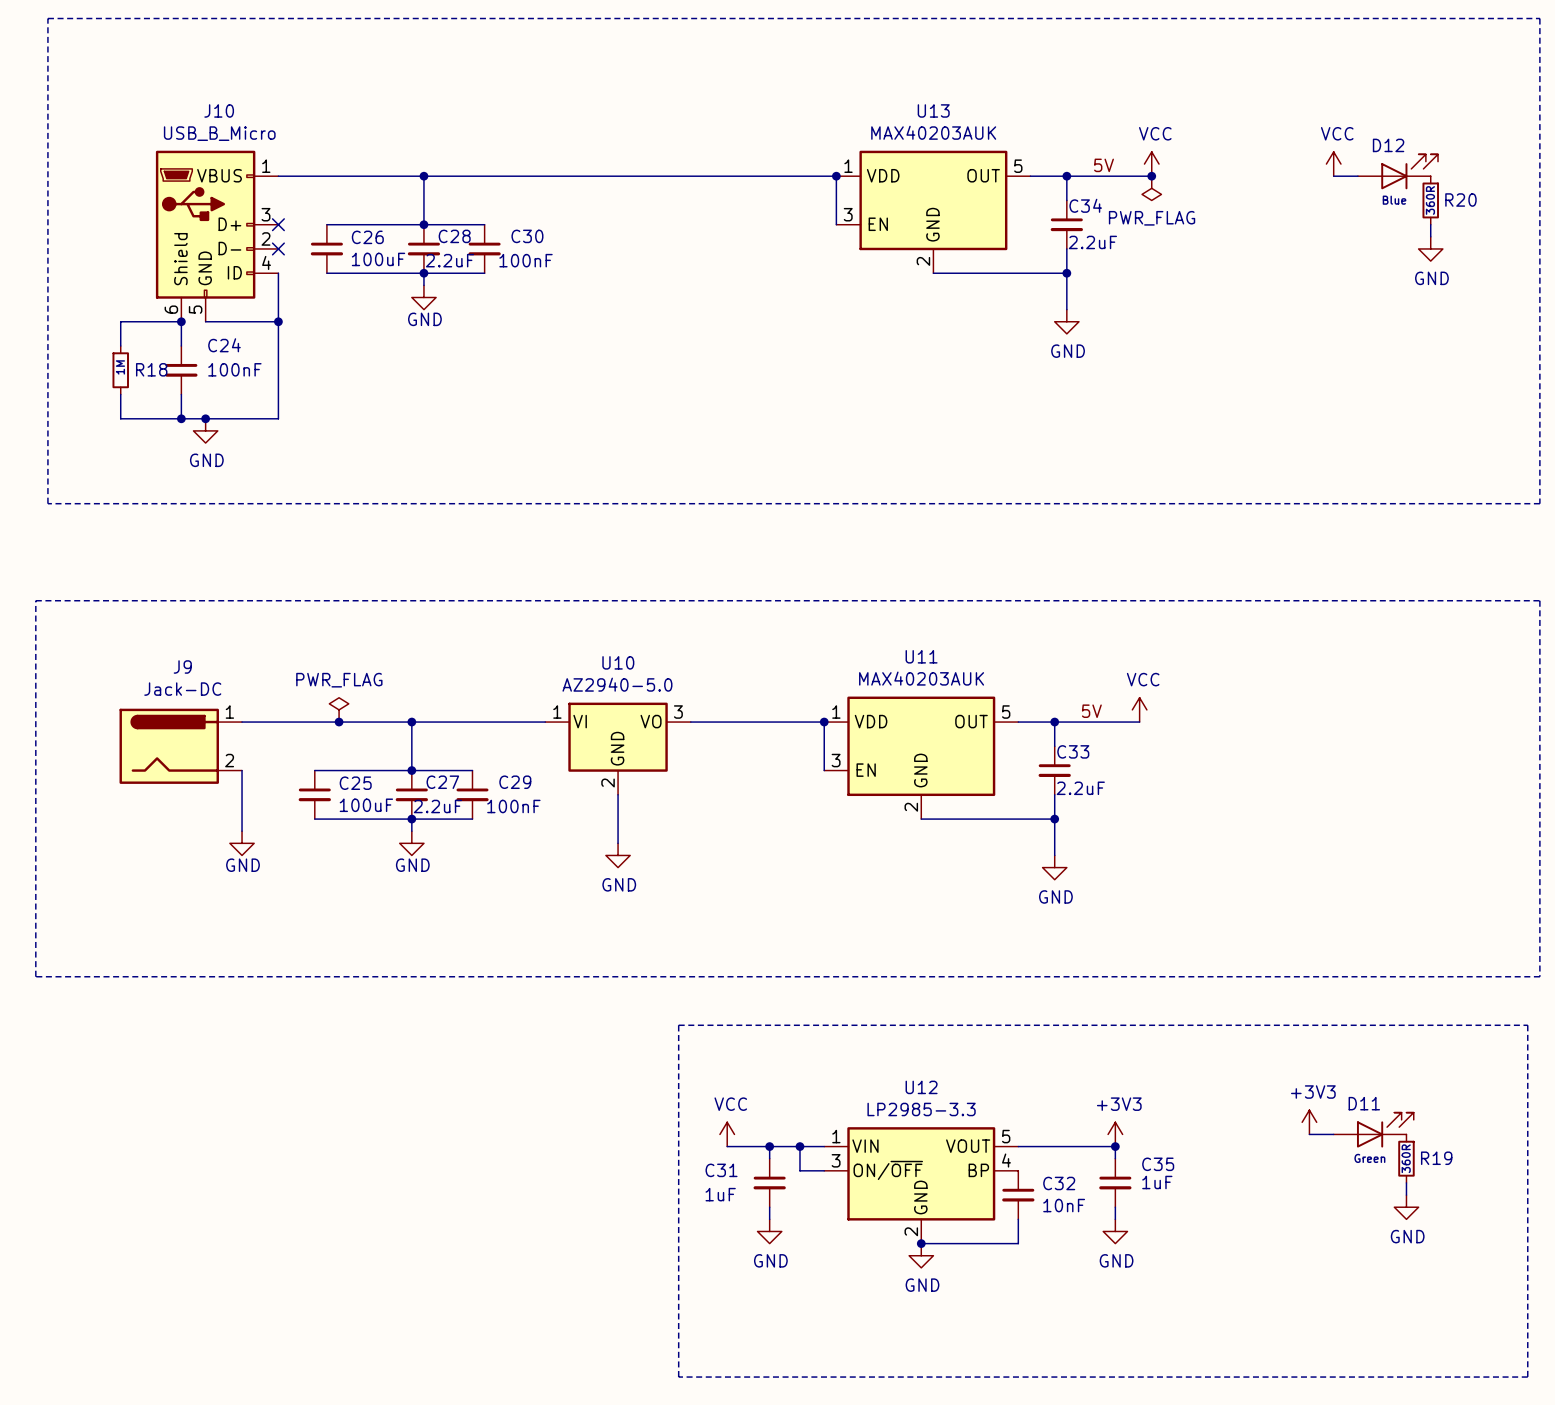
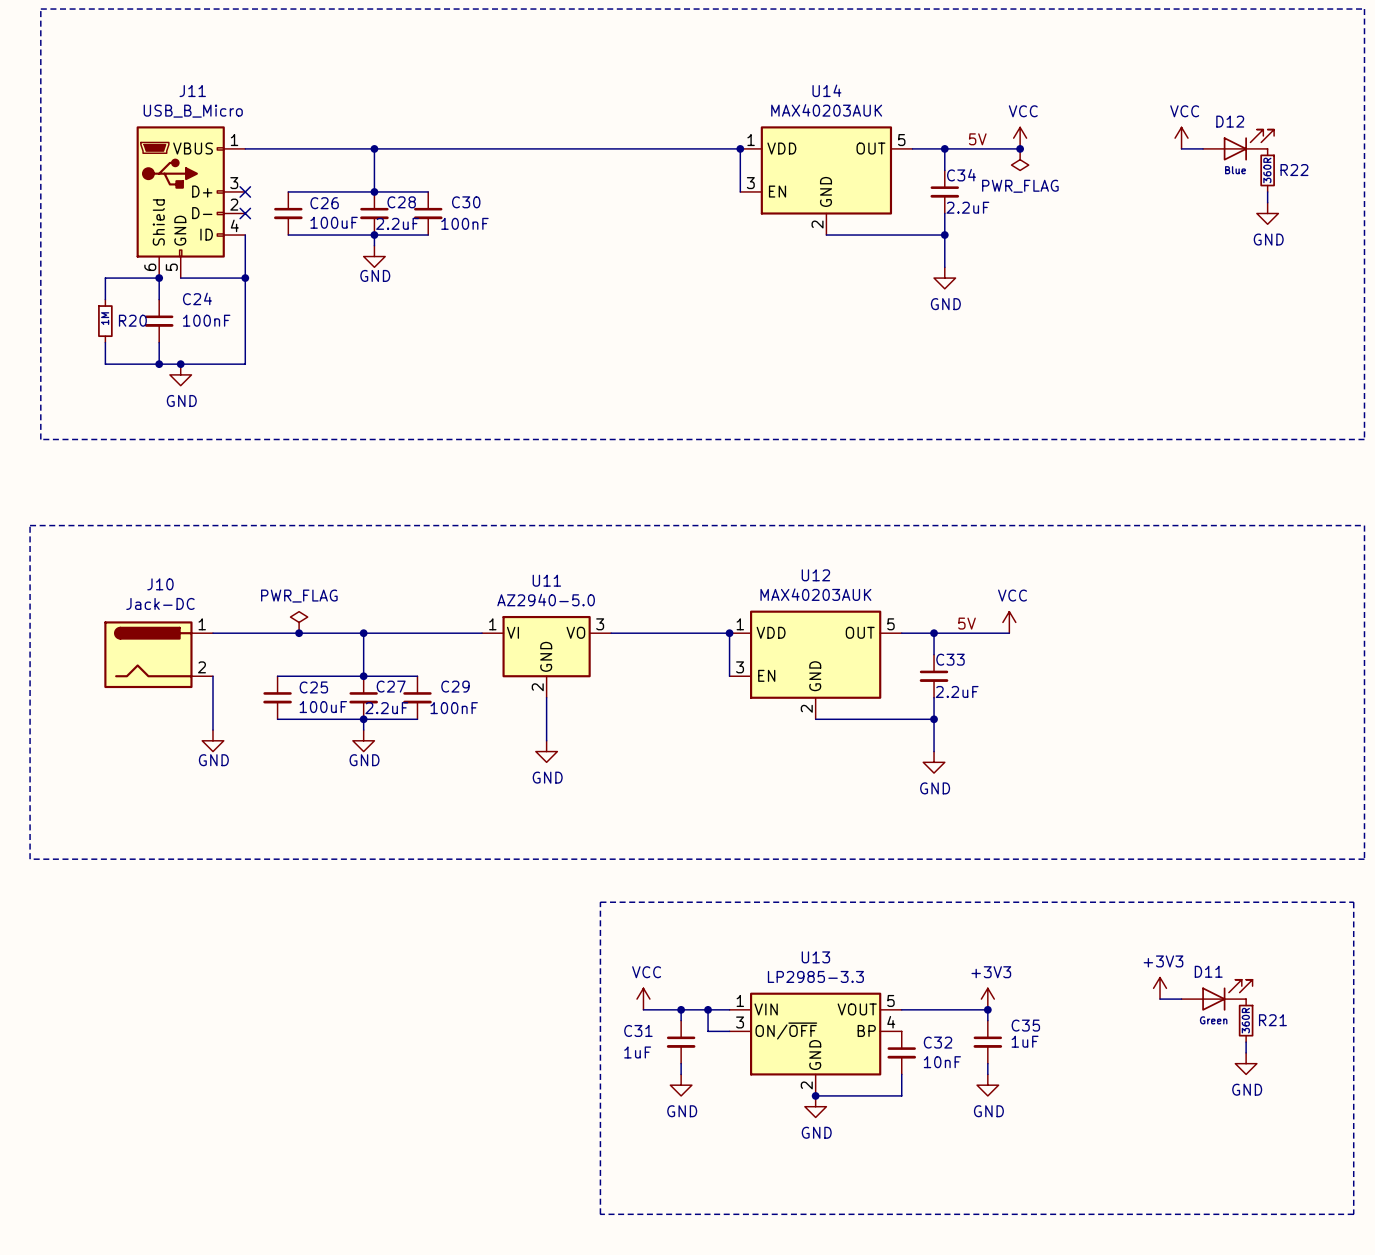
J10 name: J10 (219, 110) -> J11 (192, 91)
U13 name: U13 (933, 110) -> U14 (826, 90)
R20 name: R20 (1460, 200) -> R22 (1294, 170)
R18 name: R18 (151, 369) -> R20 (132, 320)
U11 name: U11 (921, 656) -> U12 (815, 575)
U10 name: U10 (618, 662) -> U11 (546, 580)
J9 name: J9 (182, 667) -> J10 (160, 584)
U12 name: U12 (921, 1087) -> U13 (815, 957)
R19 name: R19 (1436, 1158) -> R21 (1272, 1020)

